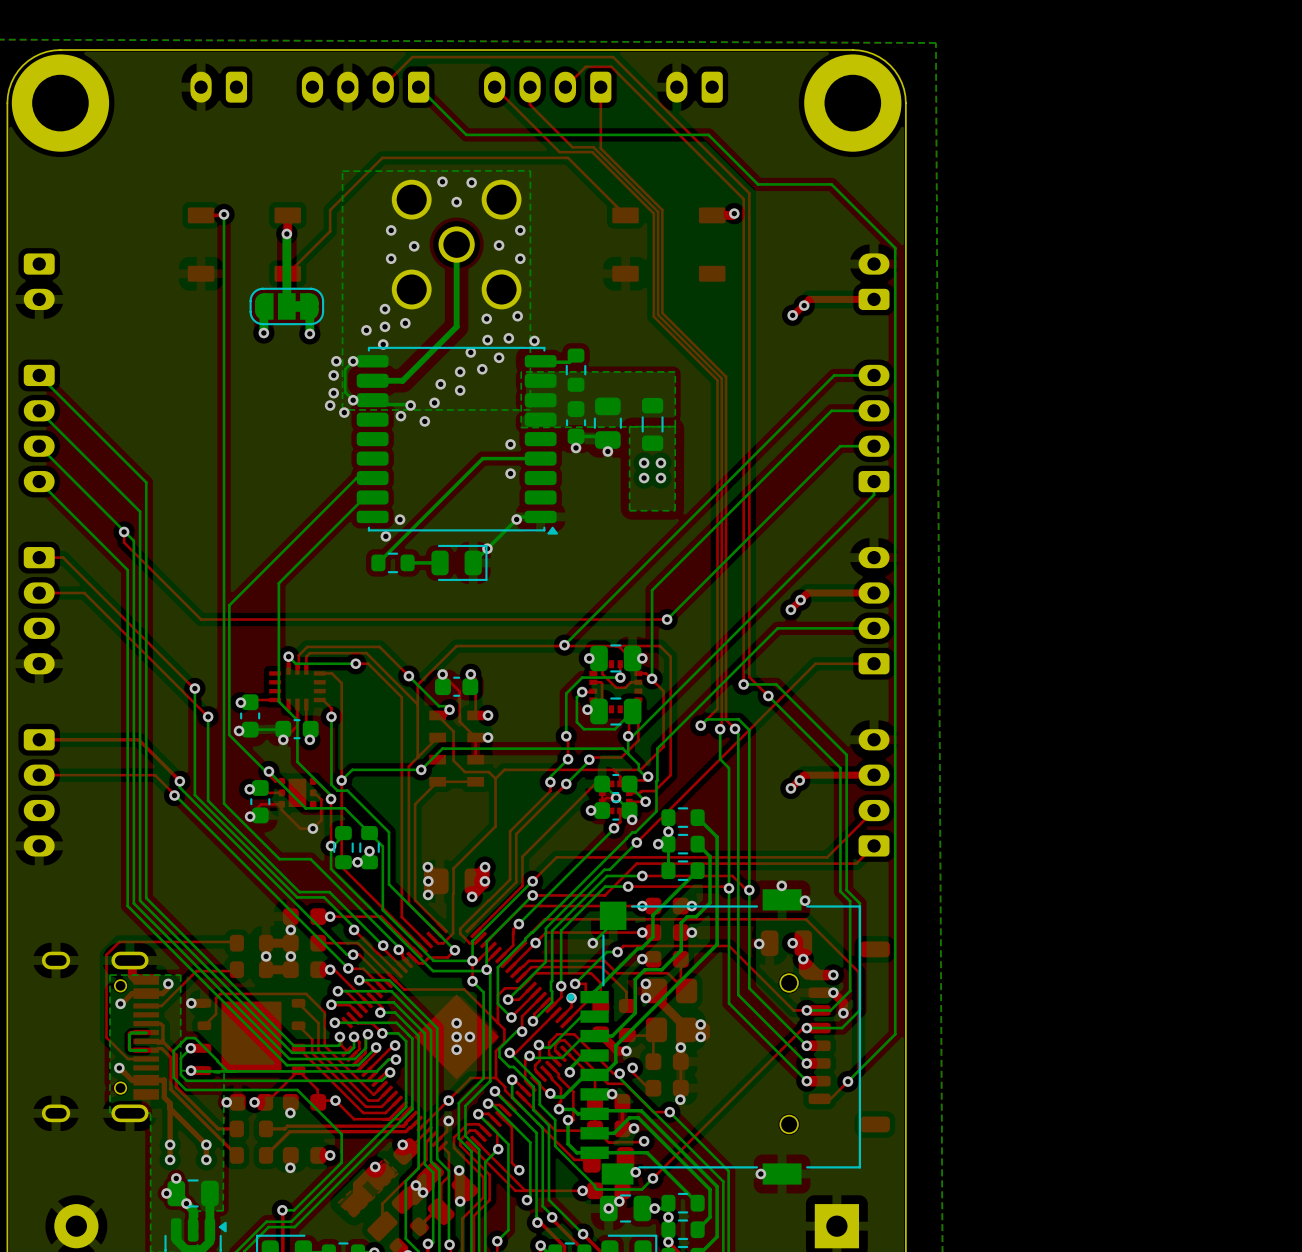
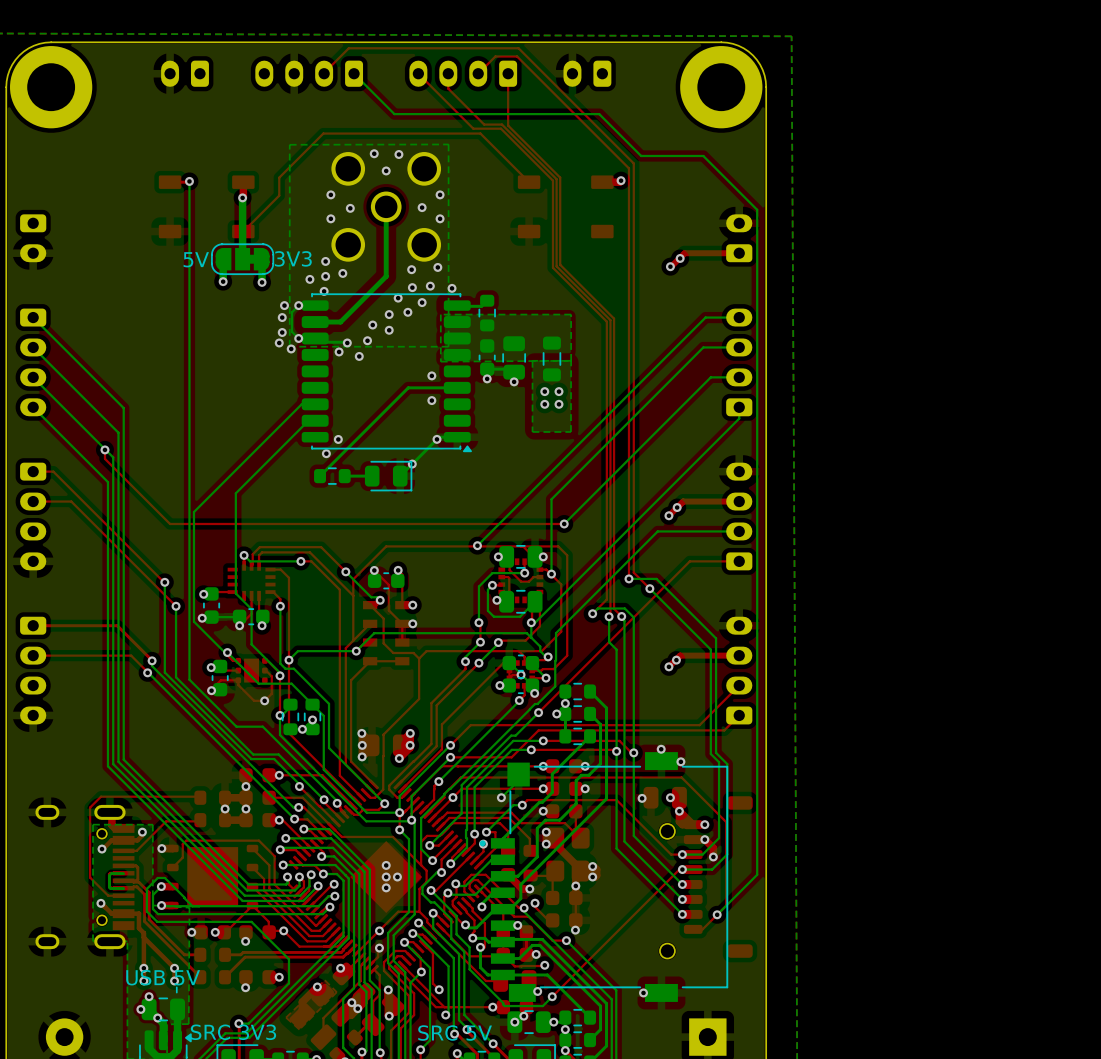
text: none -> 3V3 (293, 258)
text: none -> 5V (196, 259)
text: none -> USB 5V (163, 977)
line: none -> (176, 987) (176, 992)
text: none -> SRC 3V3 (233, 1032)
text: none -> SRC 5V (455, 1033)

